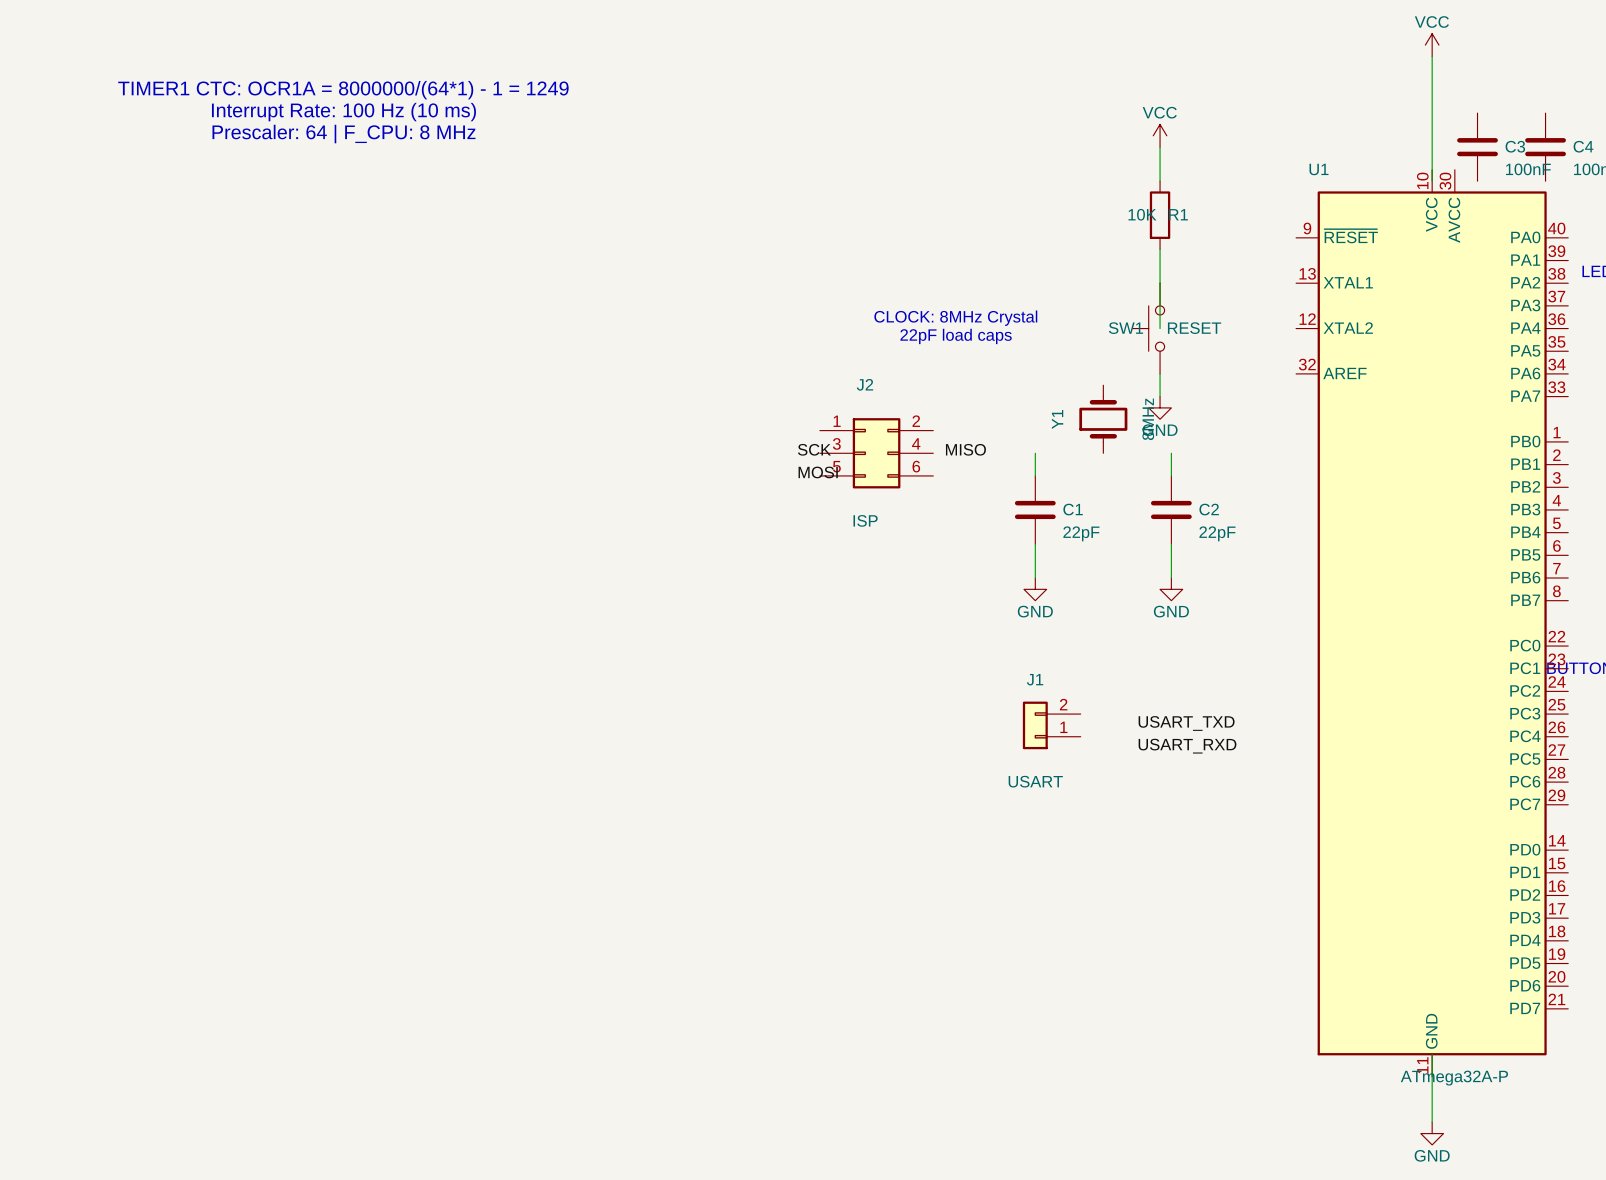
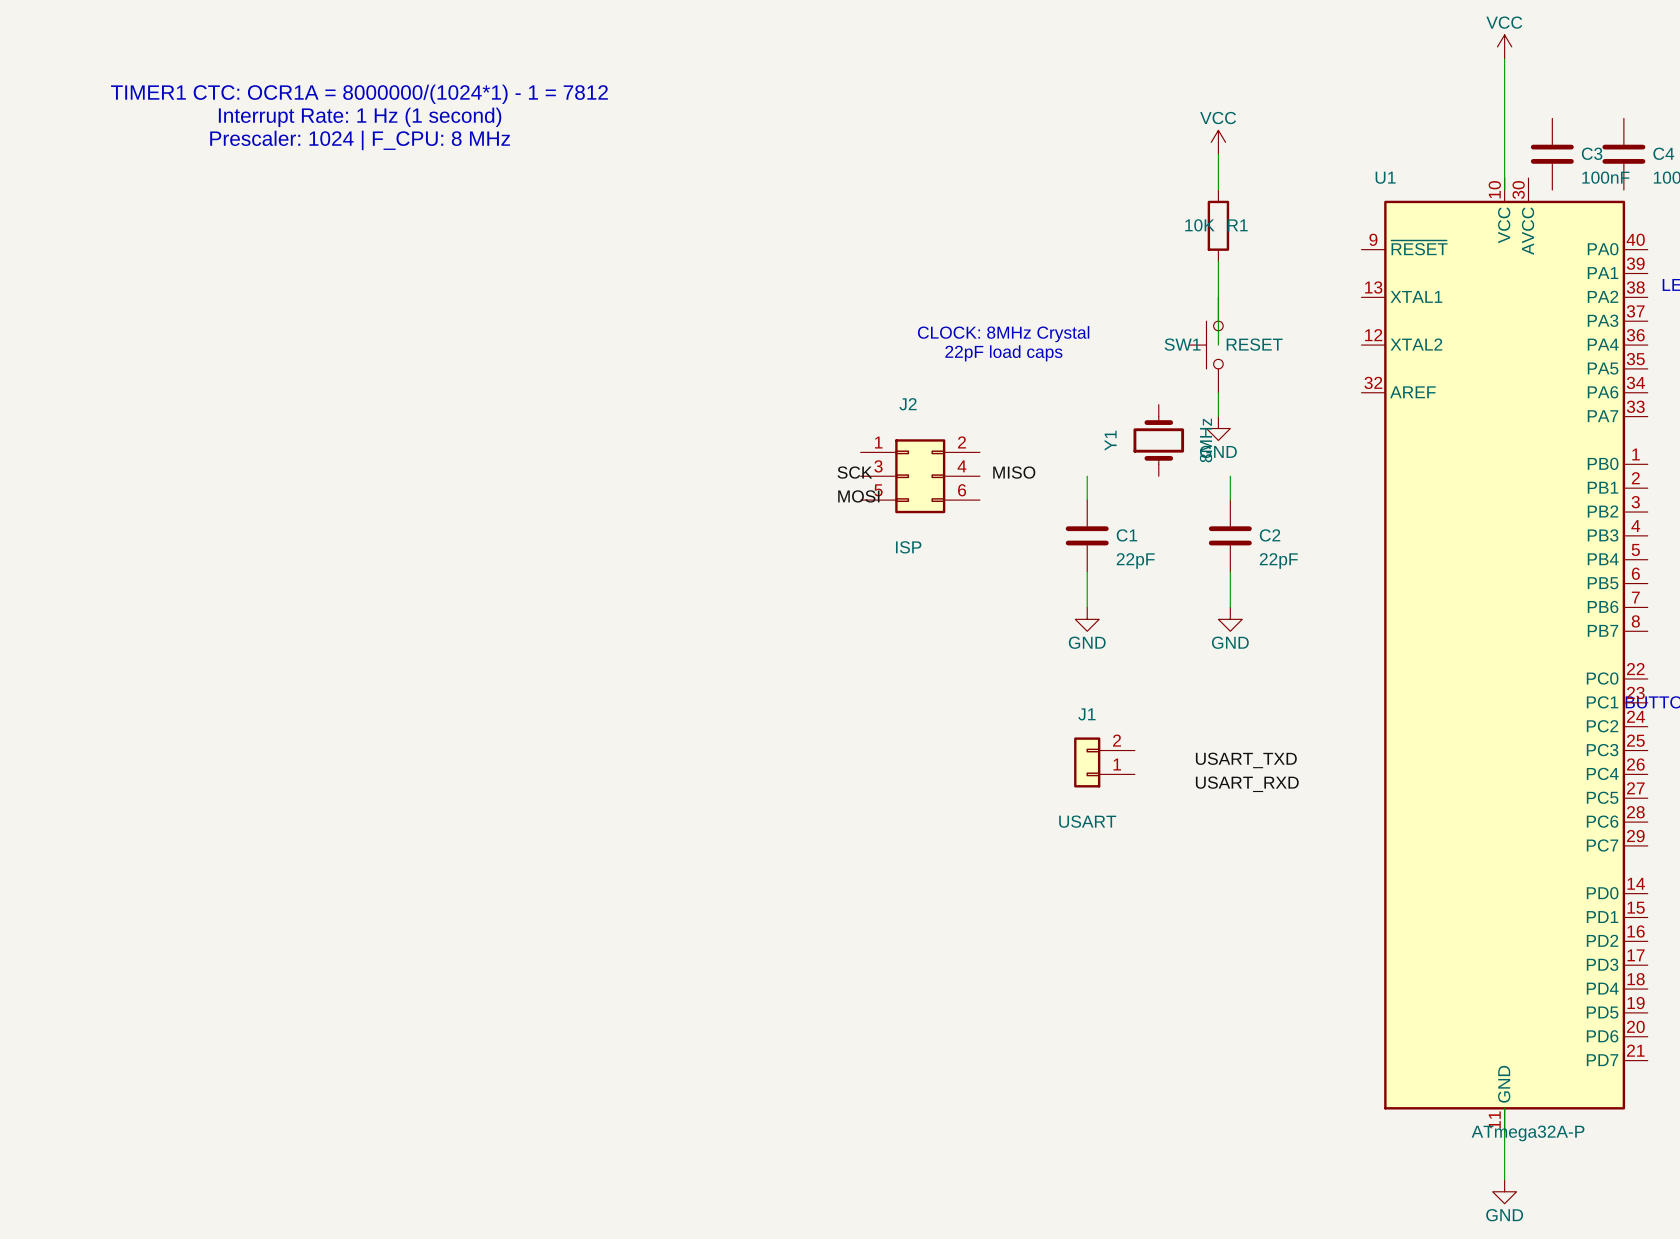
text: TIMER1 CTC: OCR1A = 8000000/(64*1) - 1 = 1249 (343, 90) -> TIMER1 CTC: OCR1A = 8000000/(1024*1) - 1 = 7812 (359, 94)
text: Interrupt Rate: 100 Hz (10 ms) (343, 112) -> Interrupt Rate: 1 Hz (1 second) (360, 117)
text: Prescaler: 64 | F_CPU: 8 MHz (343, 134) -> Prescaler: 1024 | F_CPU: 8 MHz (360, 140)

